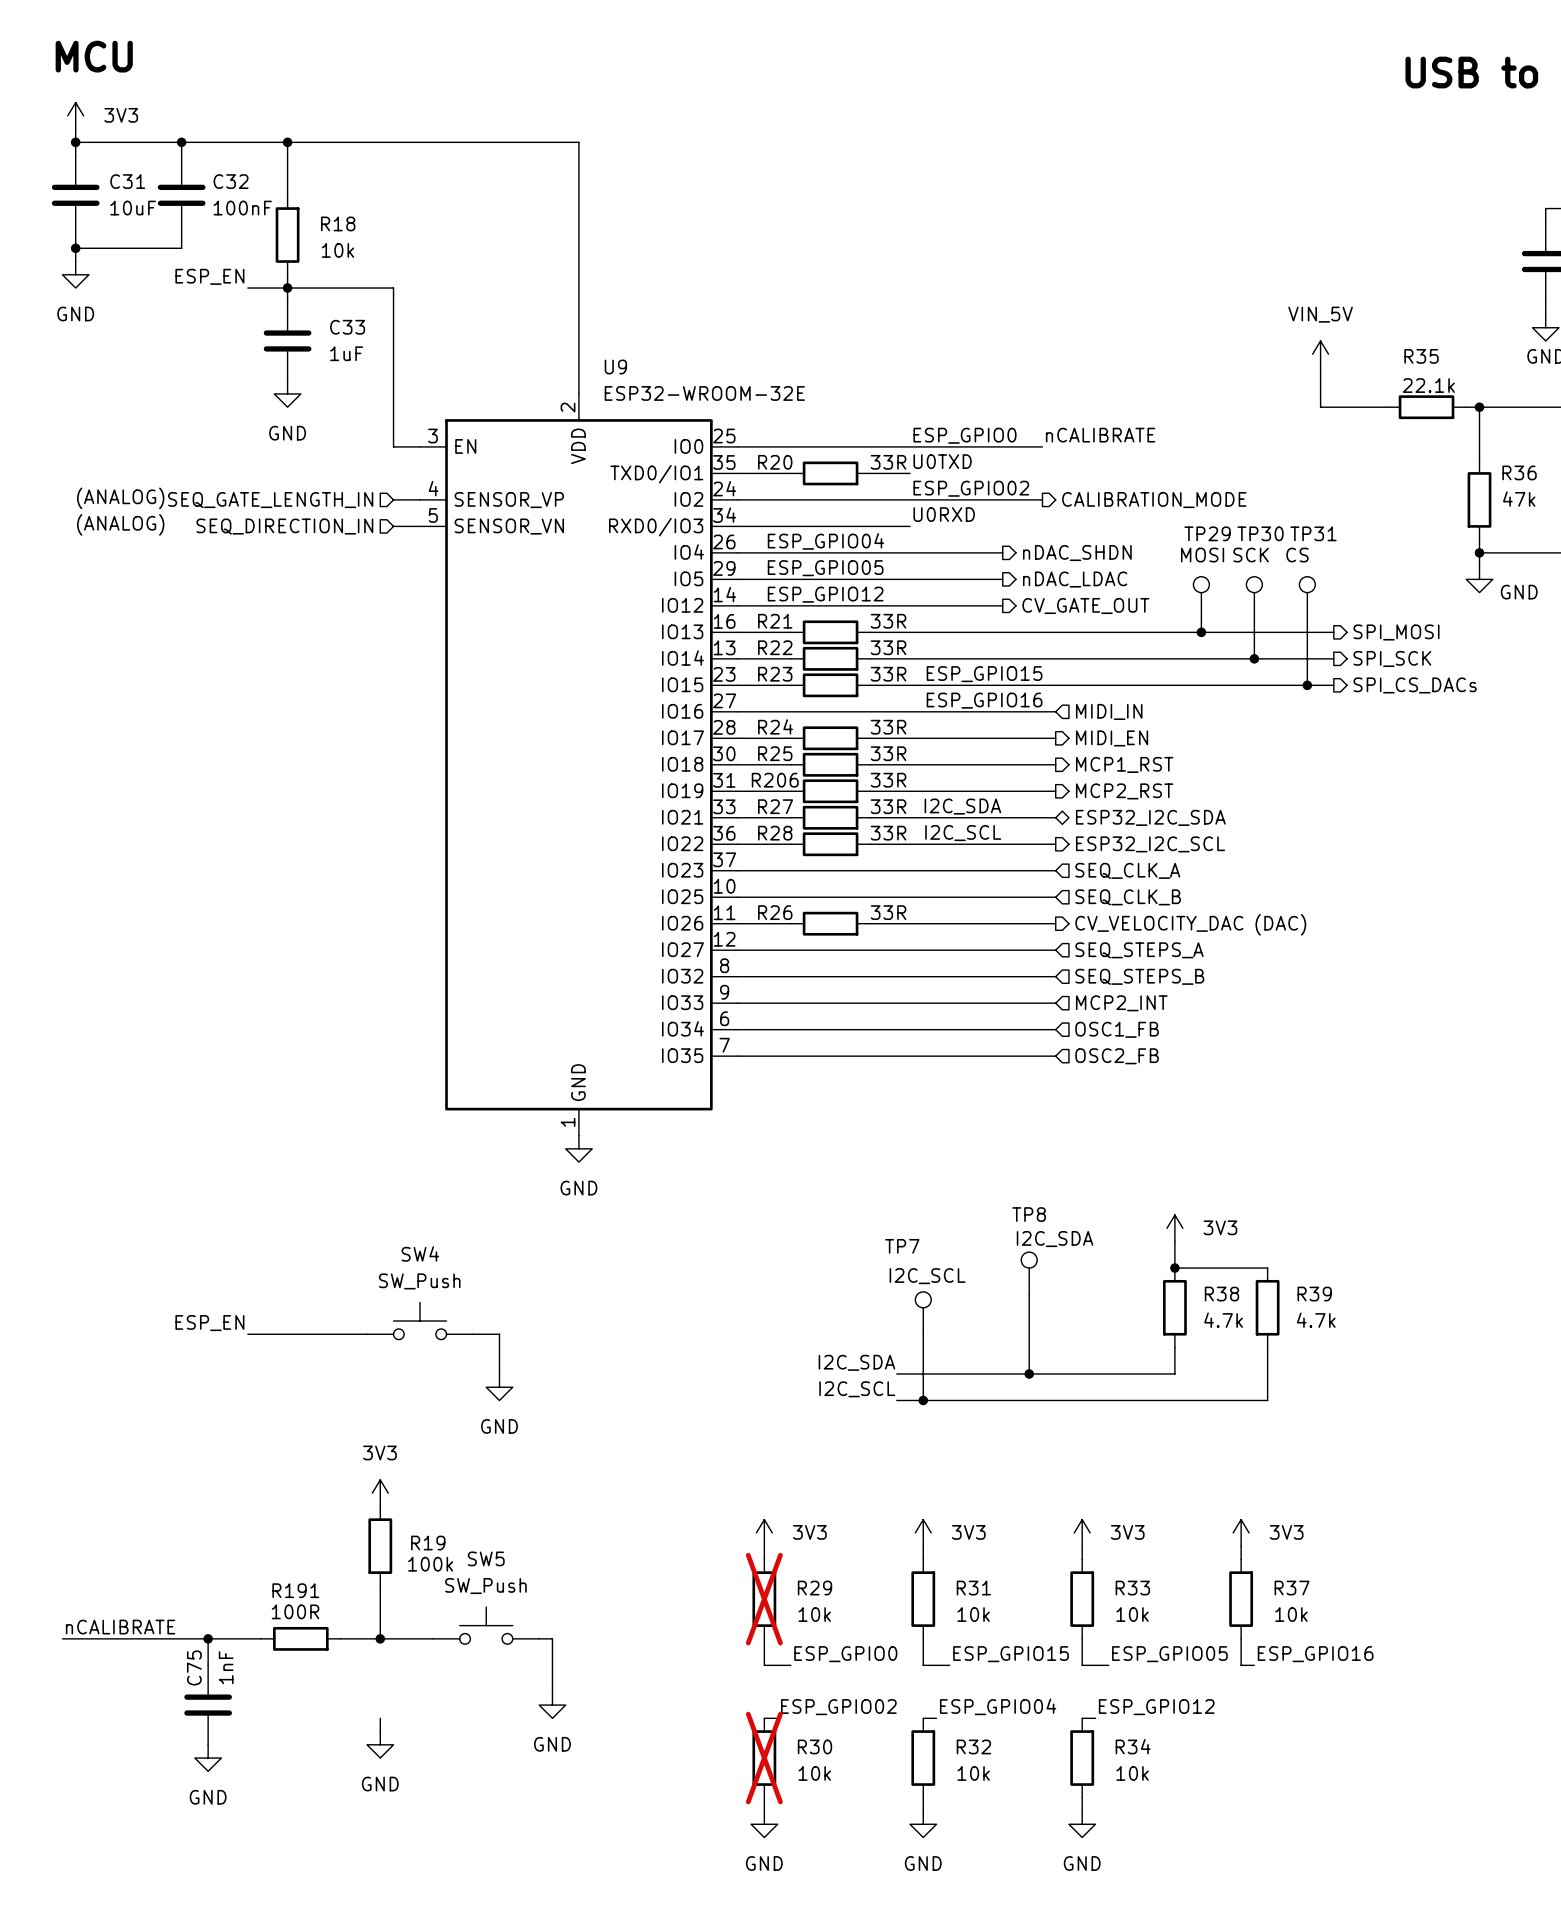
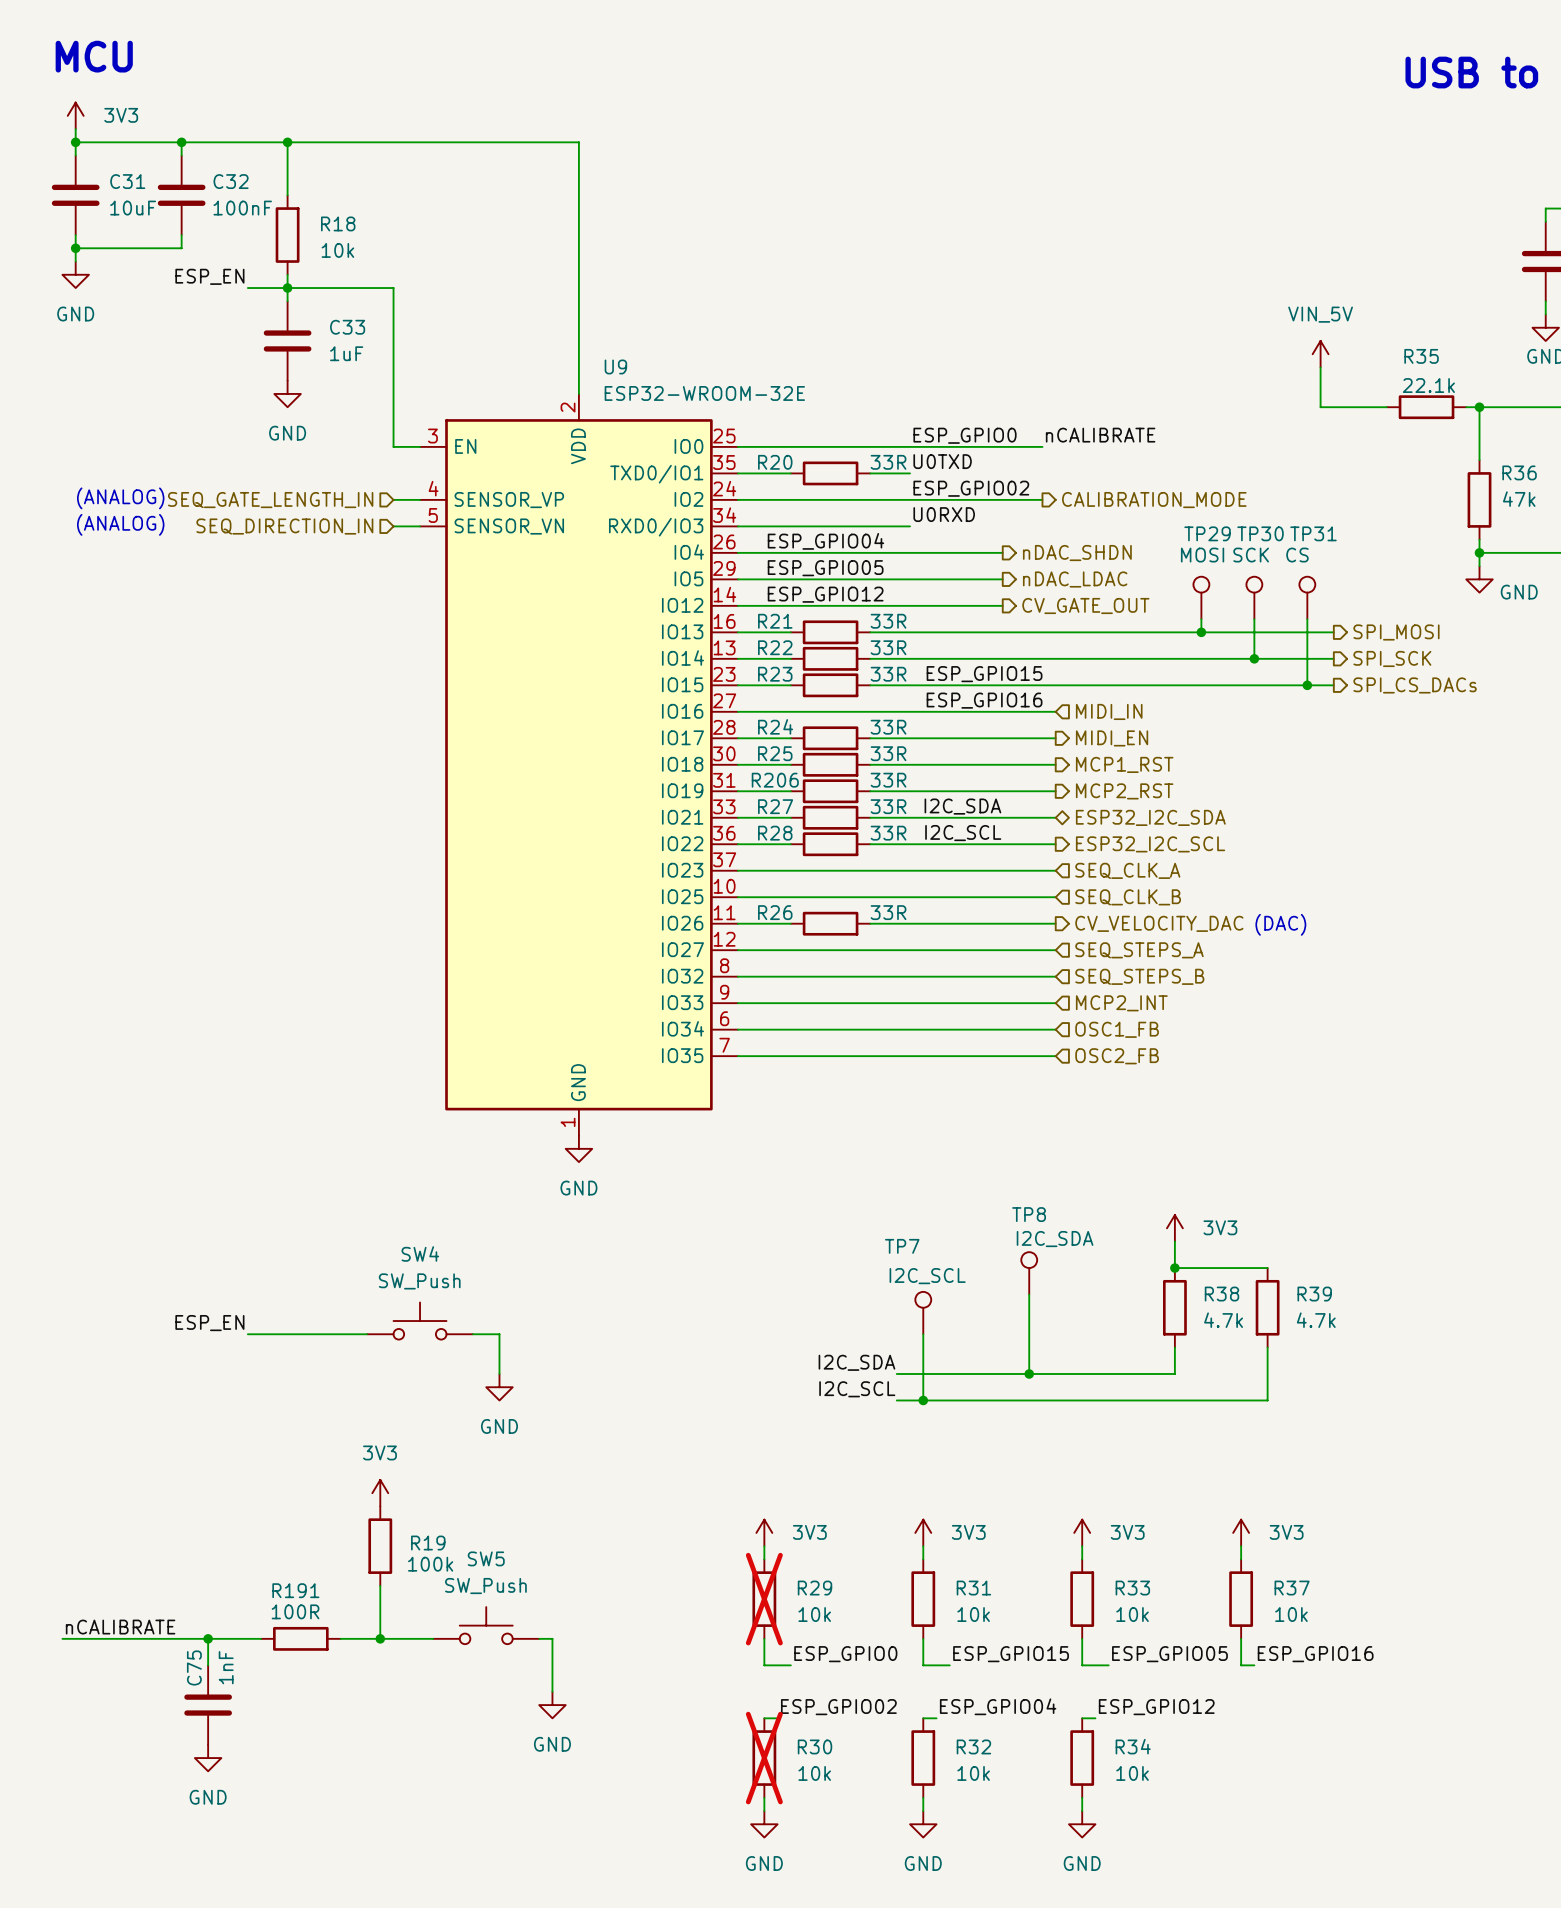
wire: (380, 1718) (380, 1731) -> none
power symbol: GND (380, 1744) -> none

